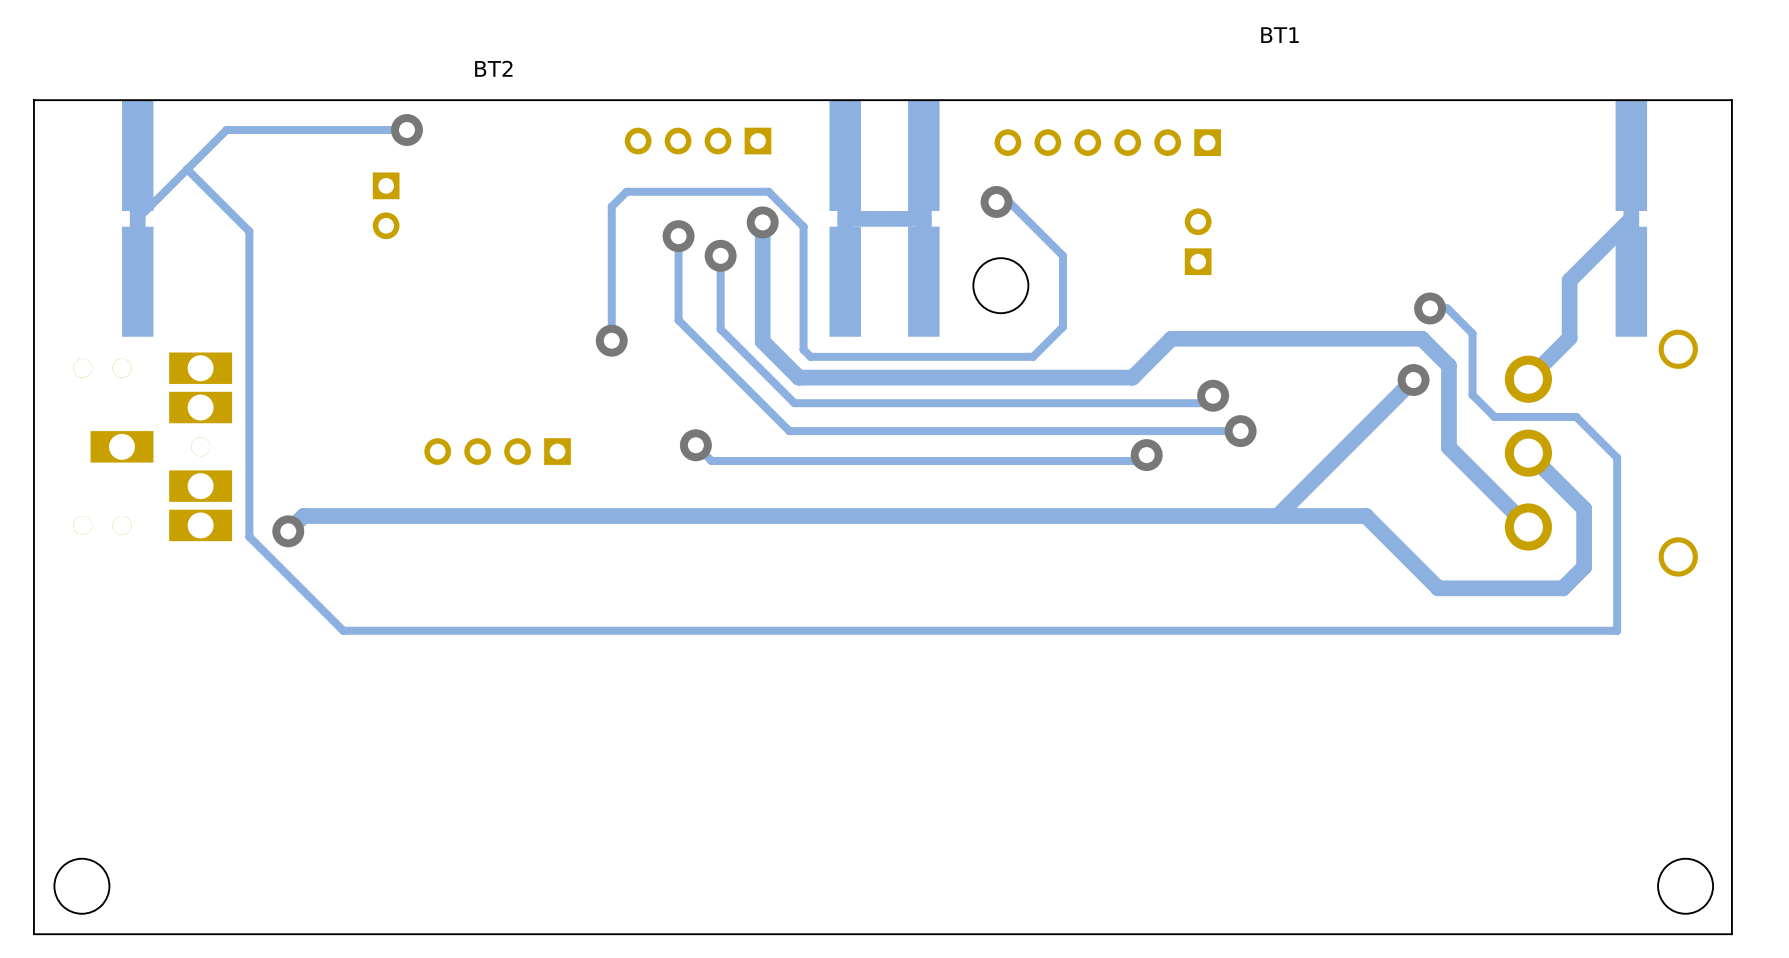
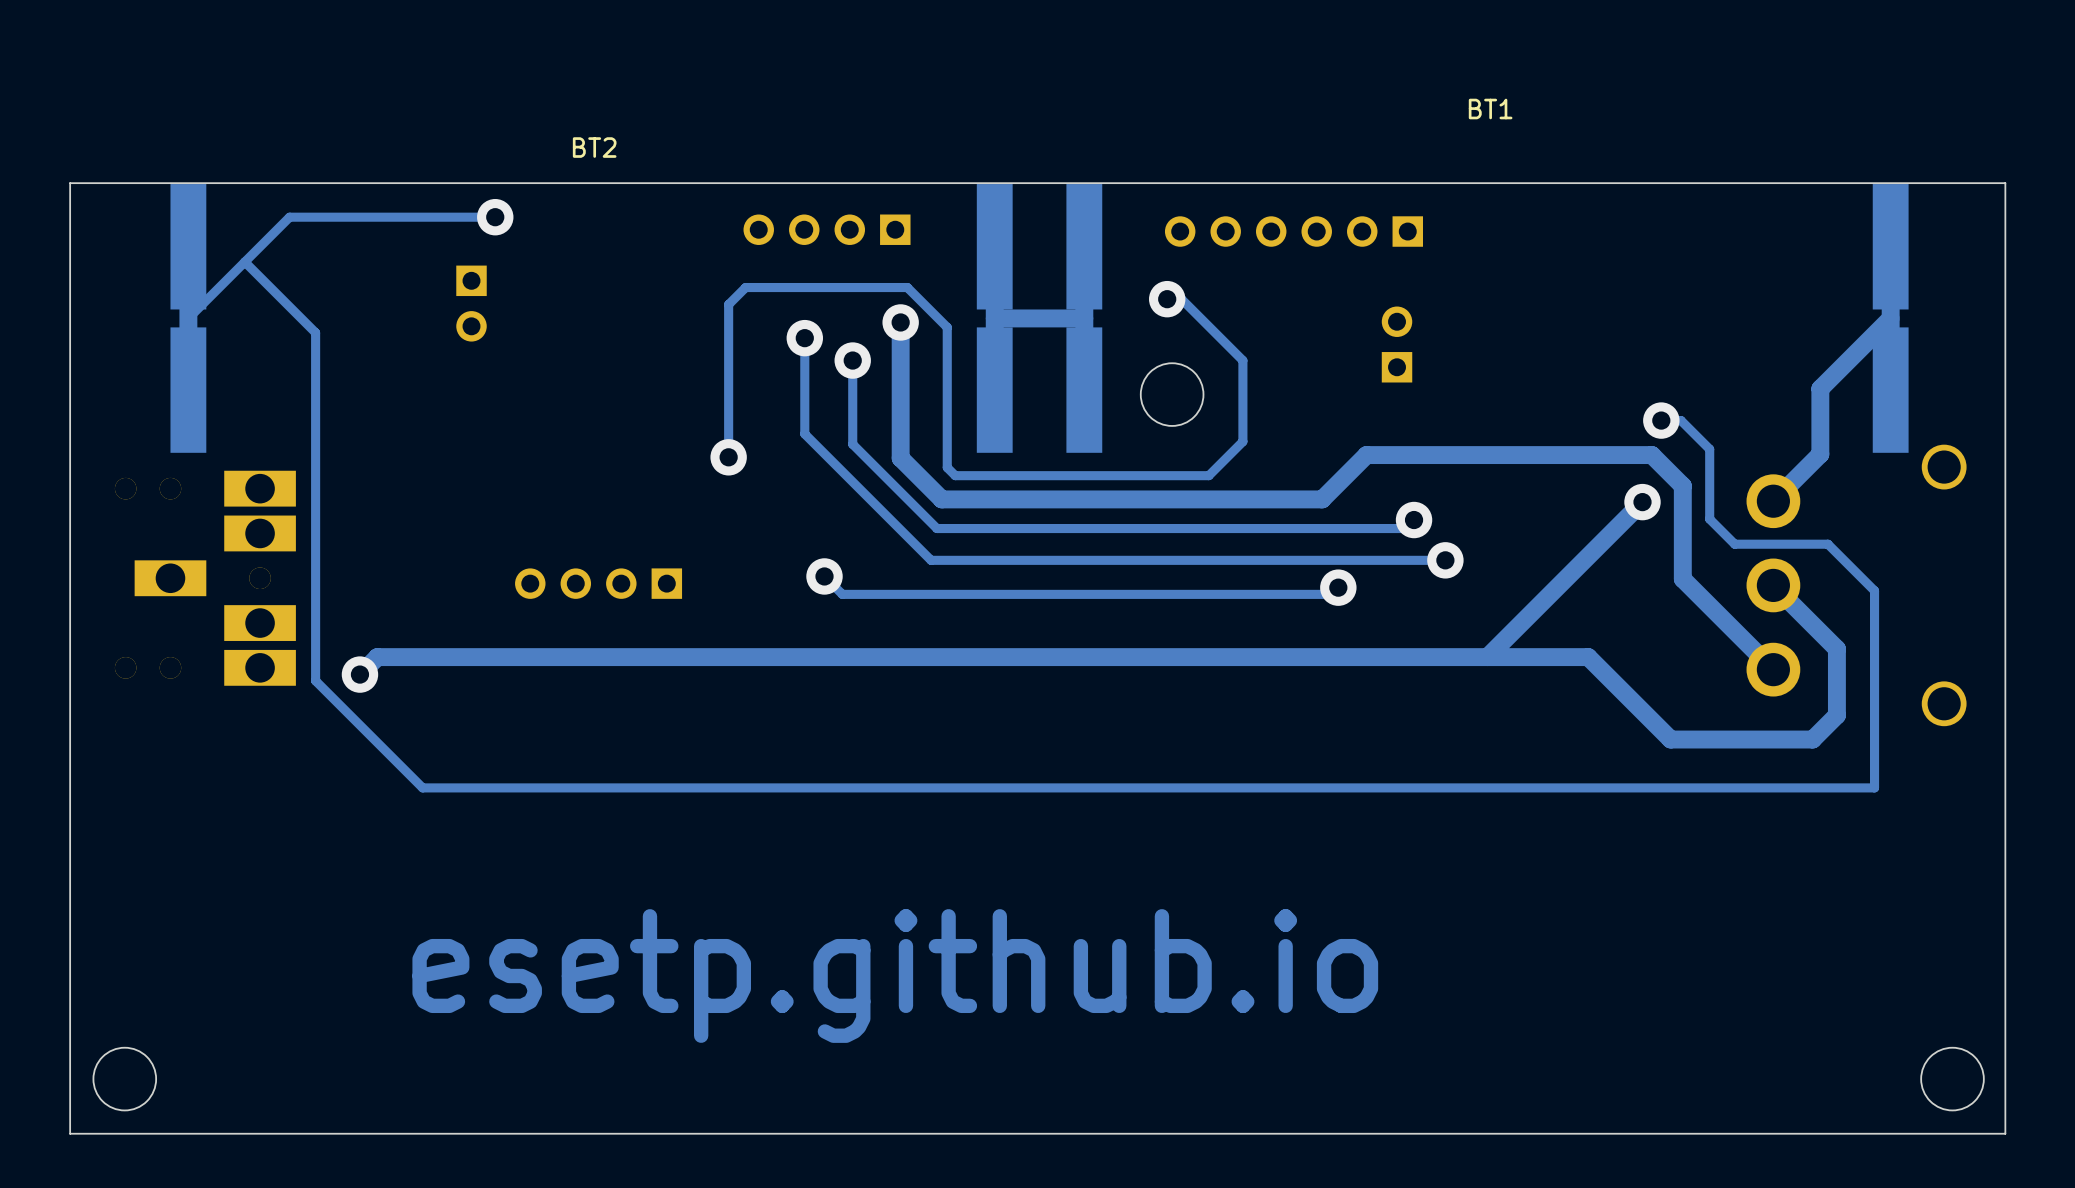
text: none -> esetp.github.io (895, 975)

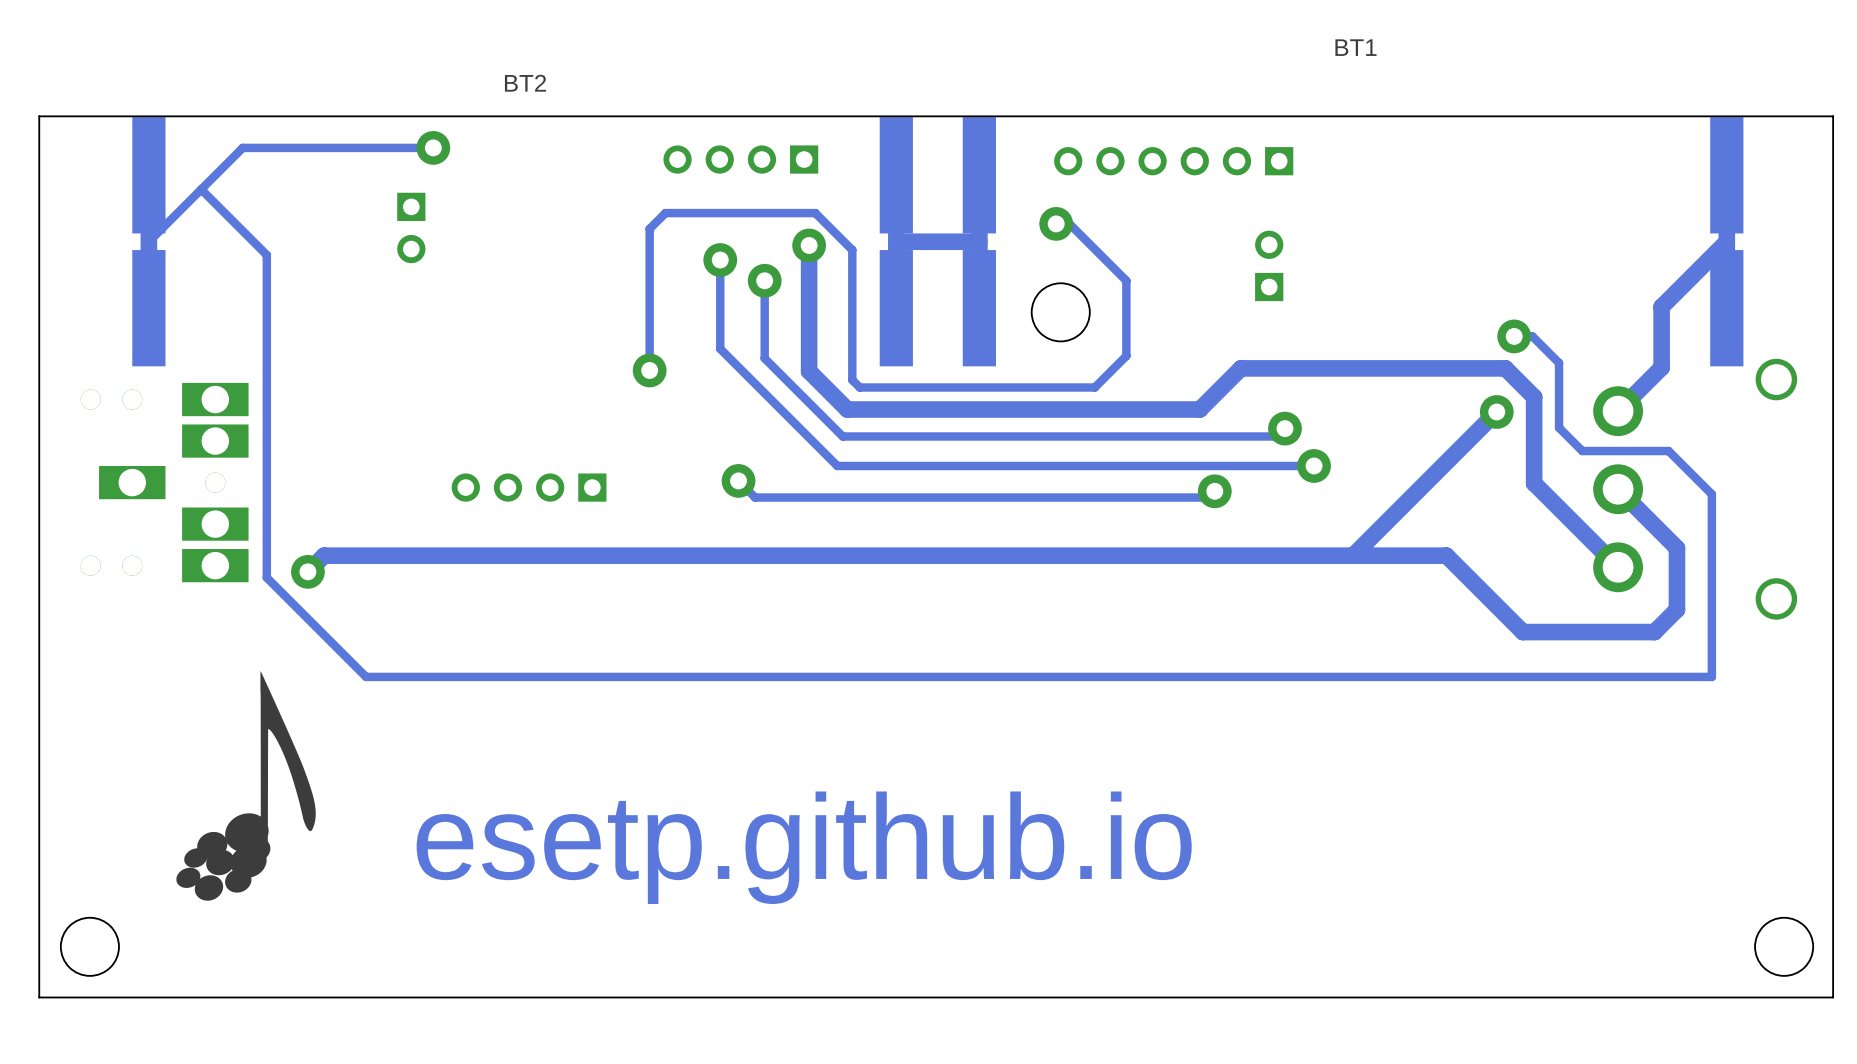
drawing: none -> [176, 671, 316, 901]

